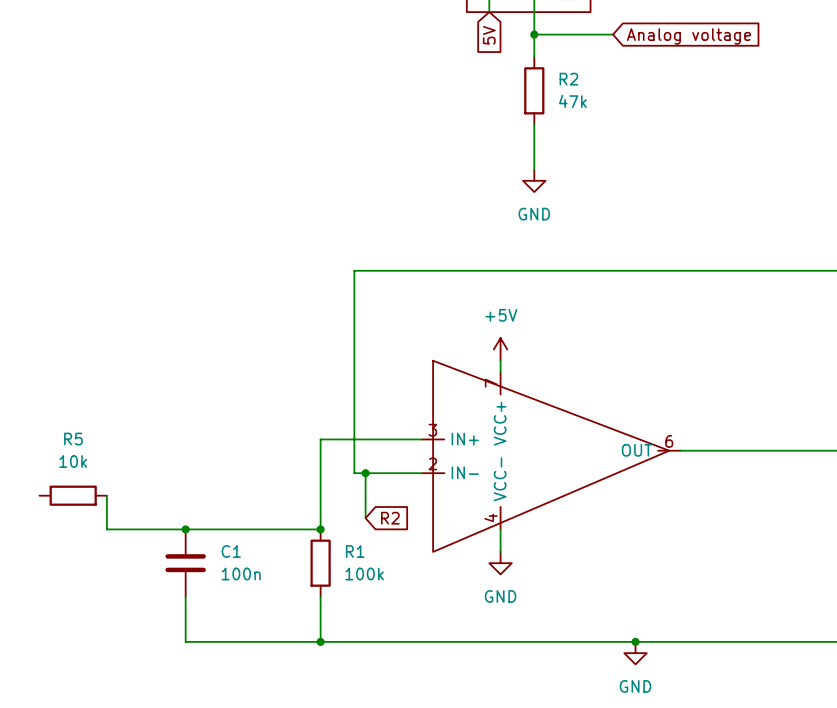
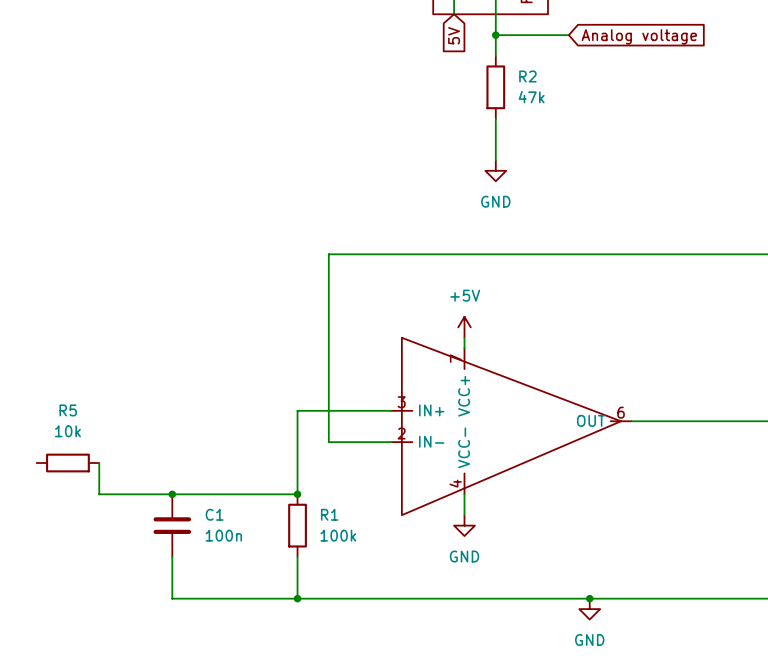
wire: (365, 473) (365, 518) -> none
junction: (365, 473) -> none
global label: R2 (390, 518) -> none

